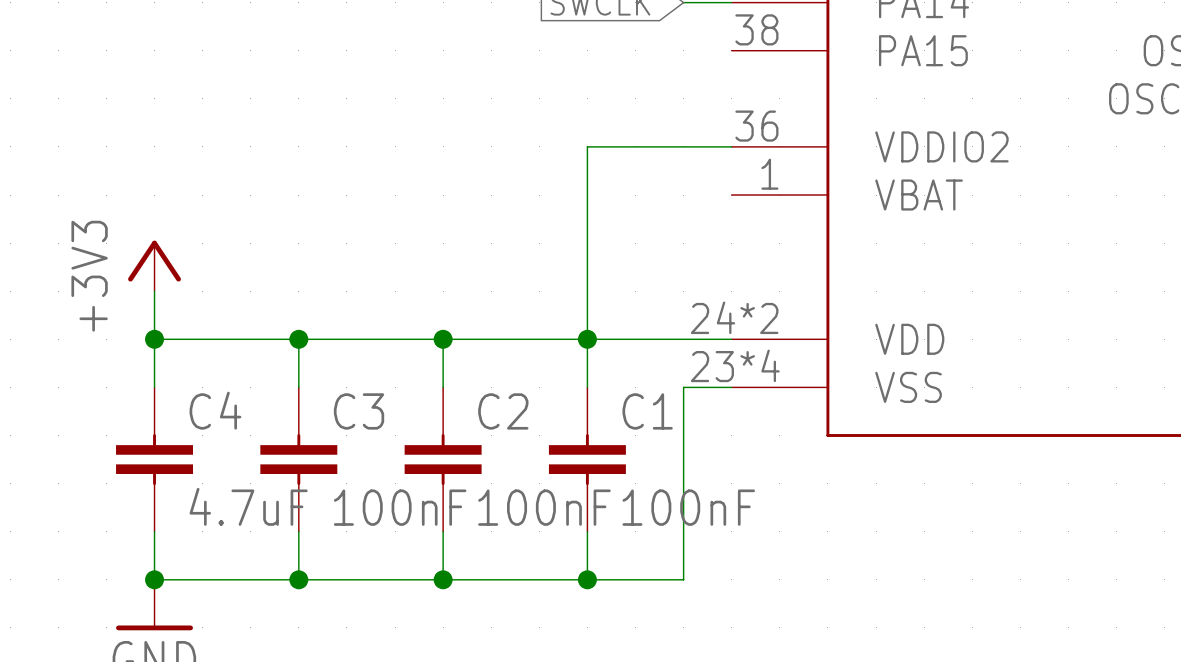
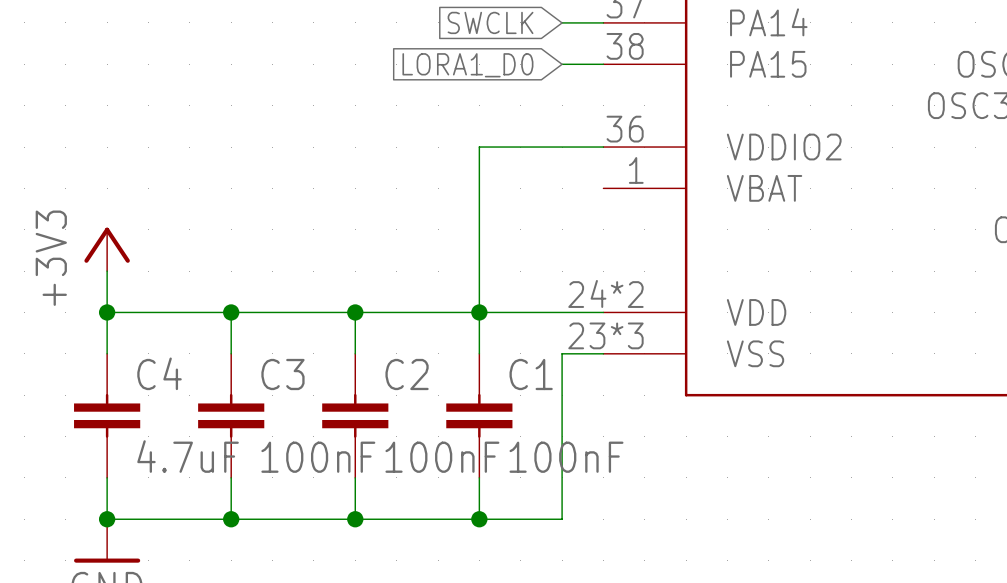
wire: none -> (562, 64) (603, 64)
global label: none -> LORA1_D0 (467, 65)
part pin number: 23*4 (735, 365) -> 23*3 (605, 335)

